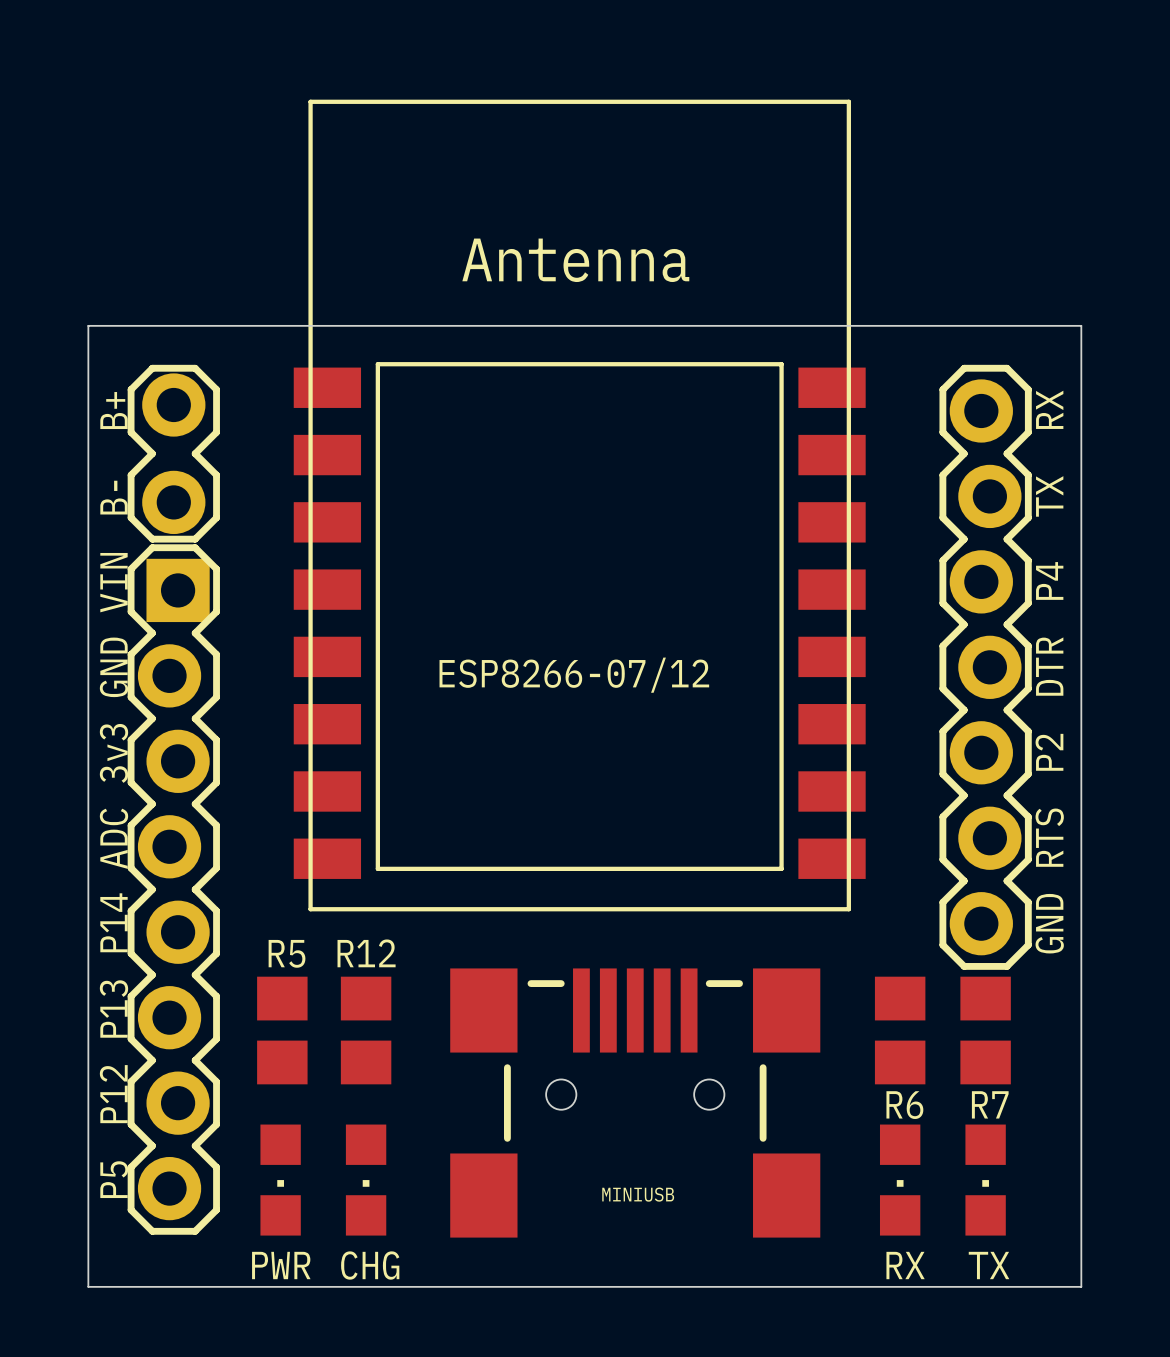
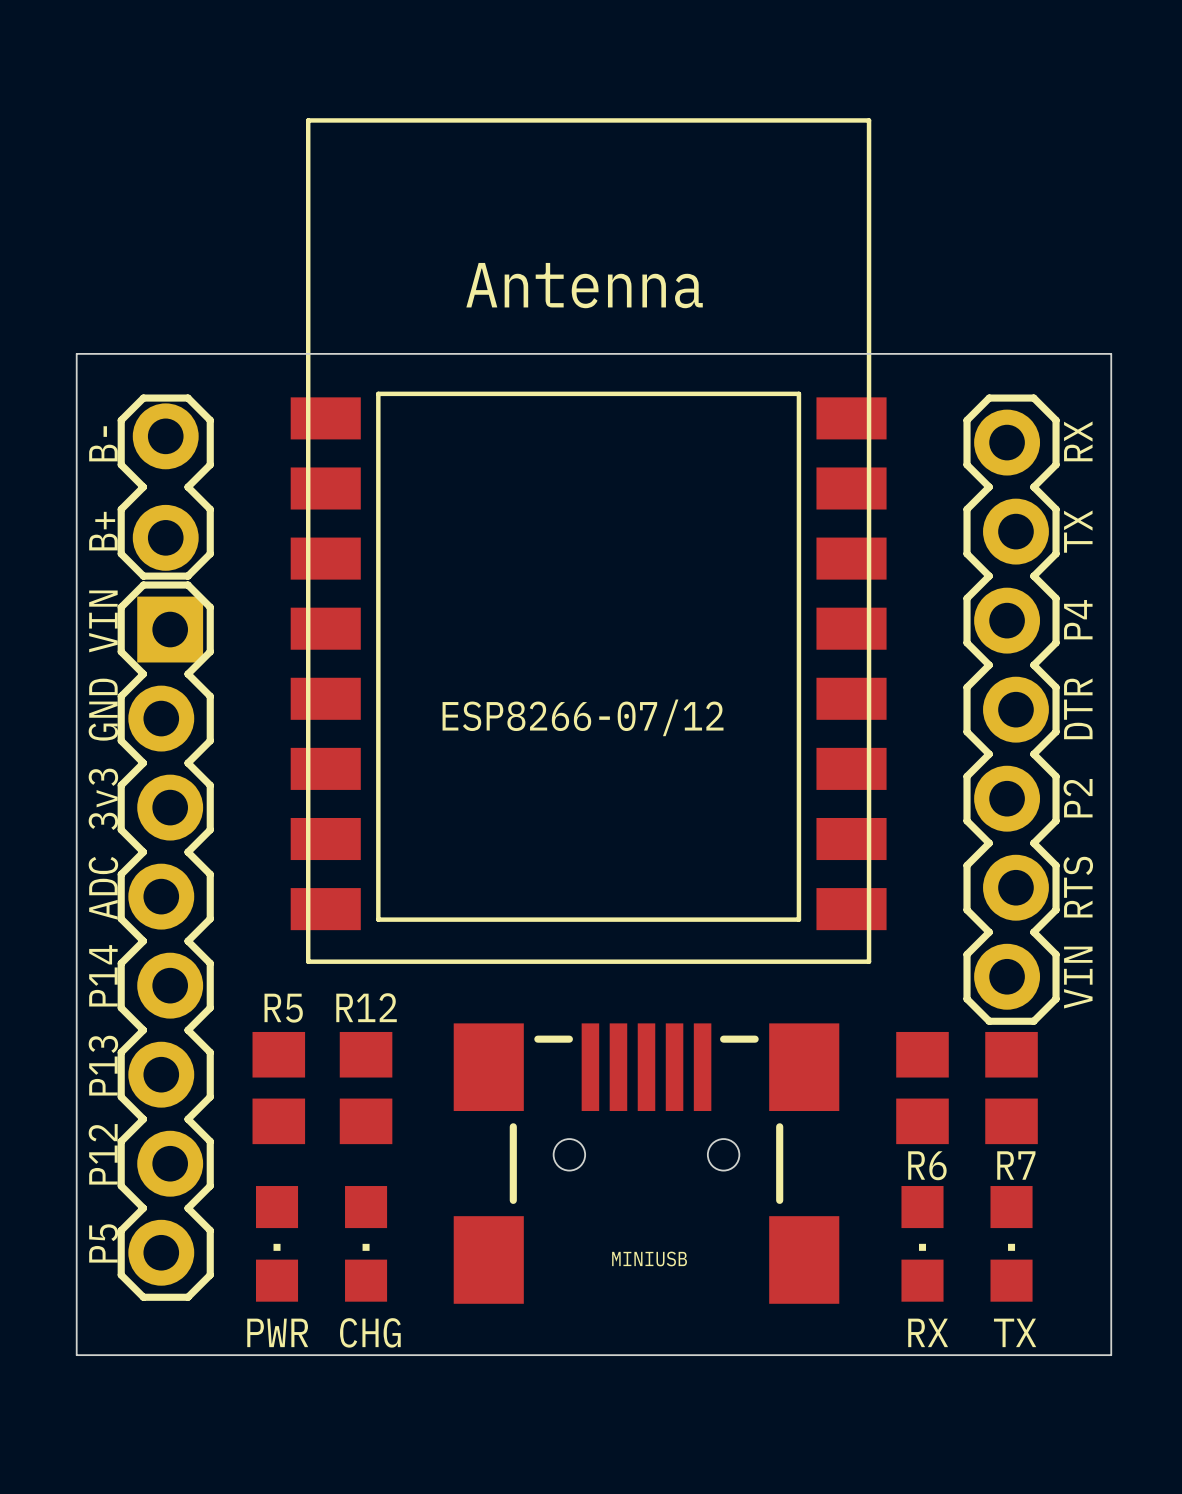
text: B+ (113, 410) -> B- (103, 443)
text: B- (113, 497) -> B+ (103, 531)
text: GND (1049, 923) -> VIN (1078, 977)

